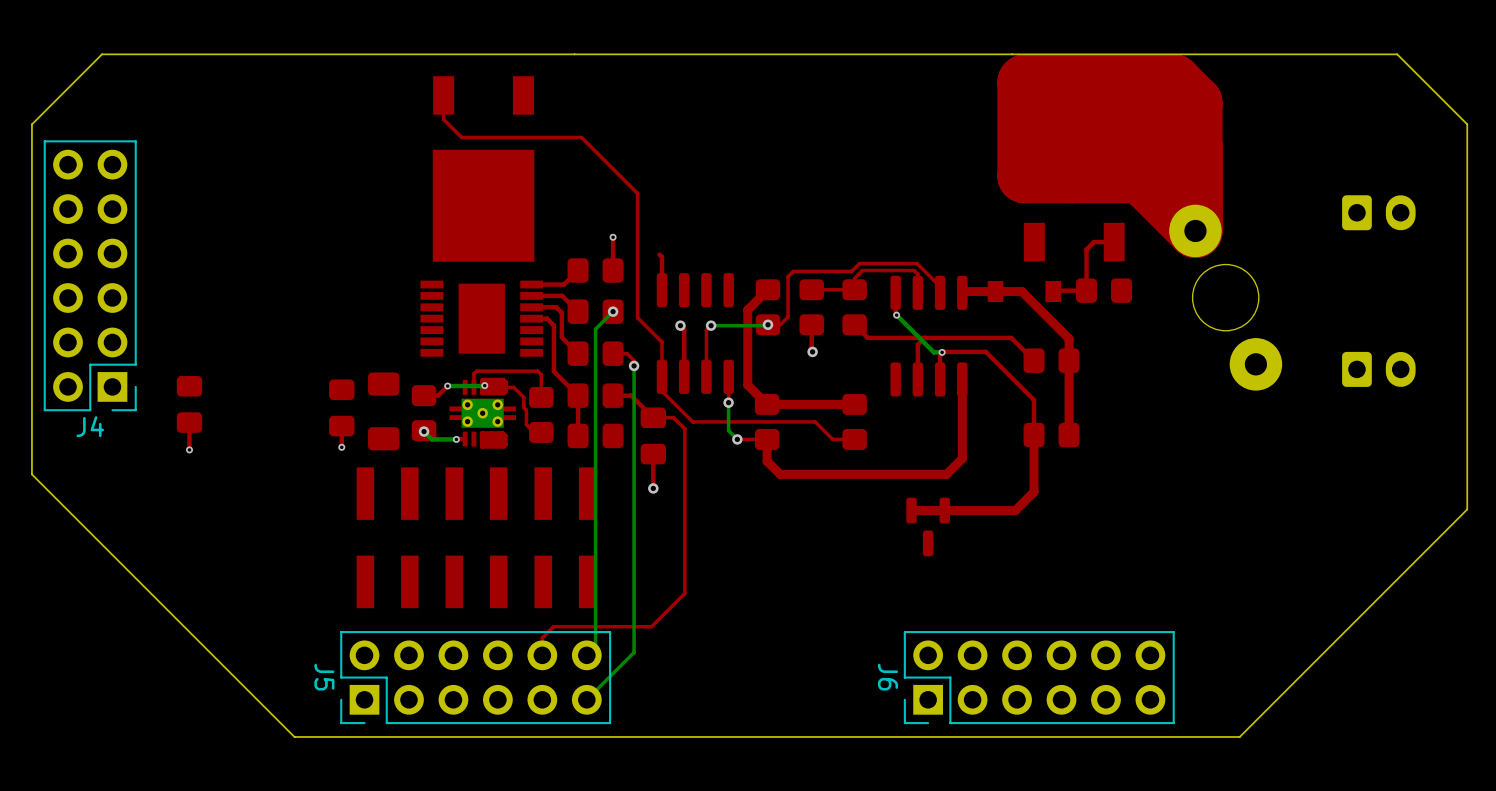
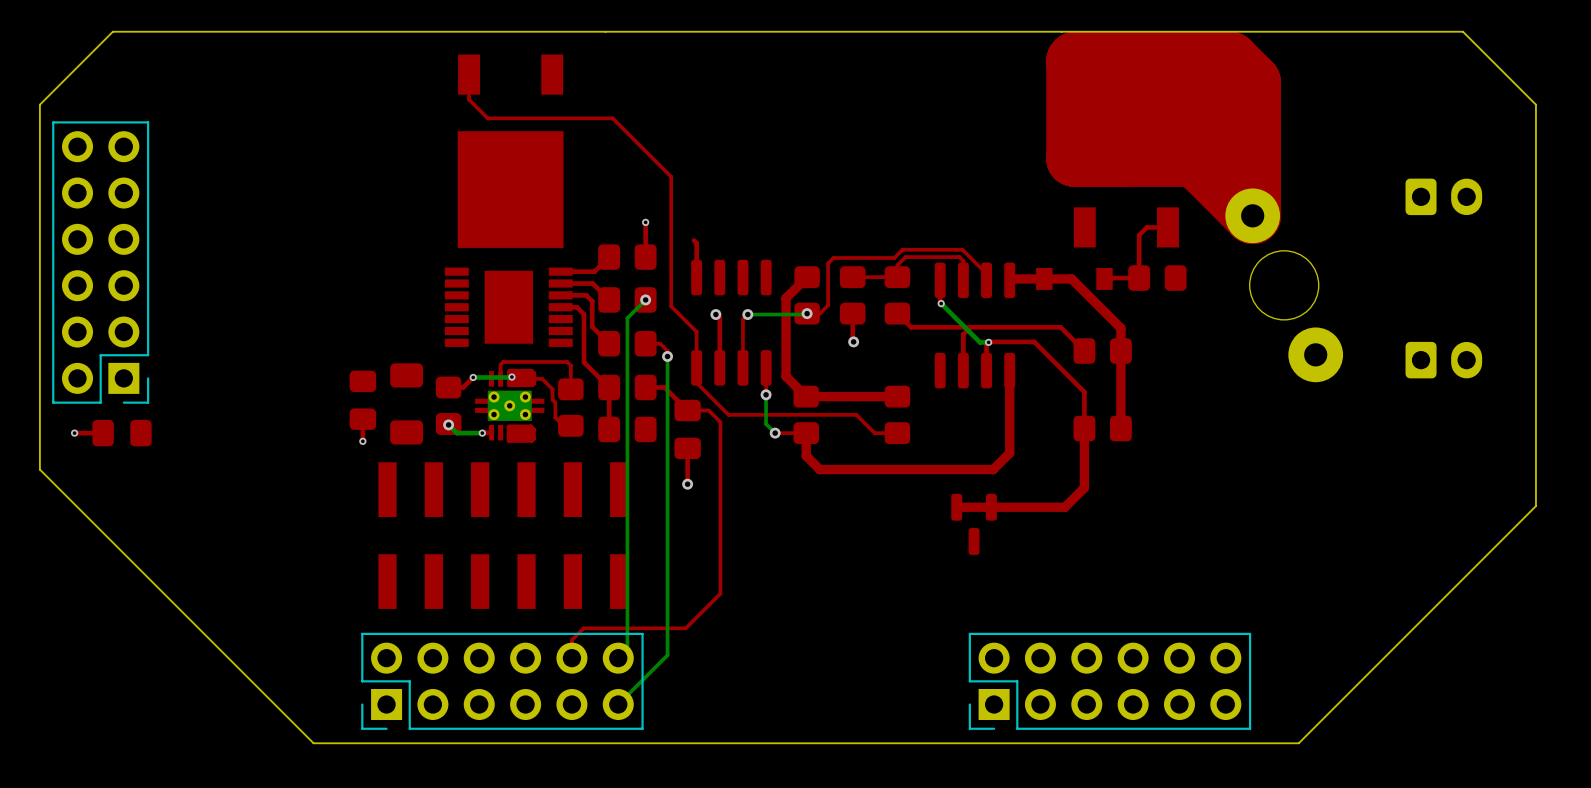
part rotation: 0° (189, 404) -> 90° clockwise (122, 433)
part position: (189, 404) -> (122, 433)
top track: (189, 422) (189, 449) -> none
J4 name: J4 (90, 426) -> none
via: none -> (74, 433)
top track: none -> (103, 433) (74, 433)
via: (189, 449) -> none
J5 name: J5 (324, 677) -> none
J6: (1039, 677) -> none
part: none -> (1109, 681)

